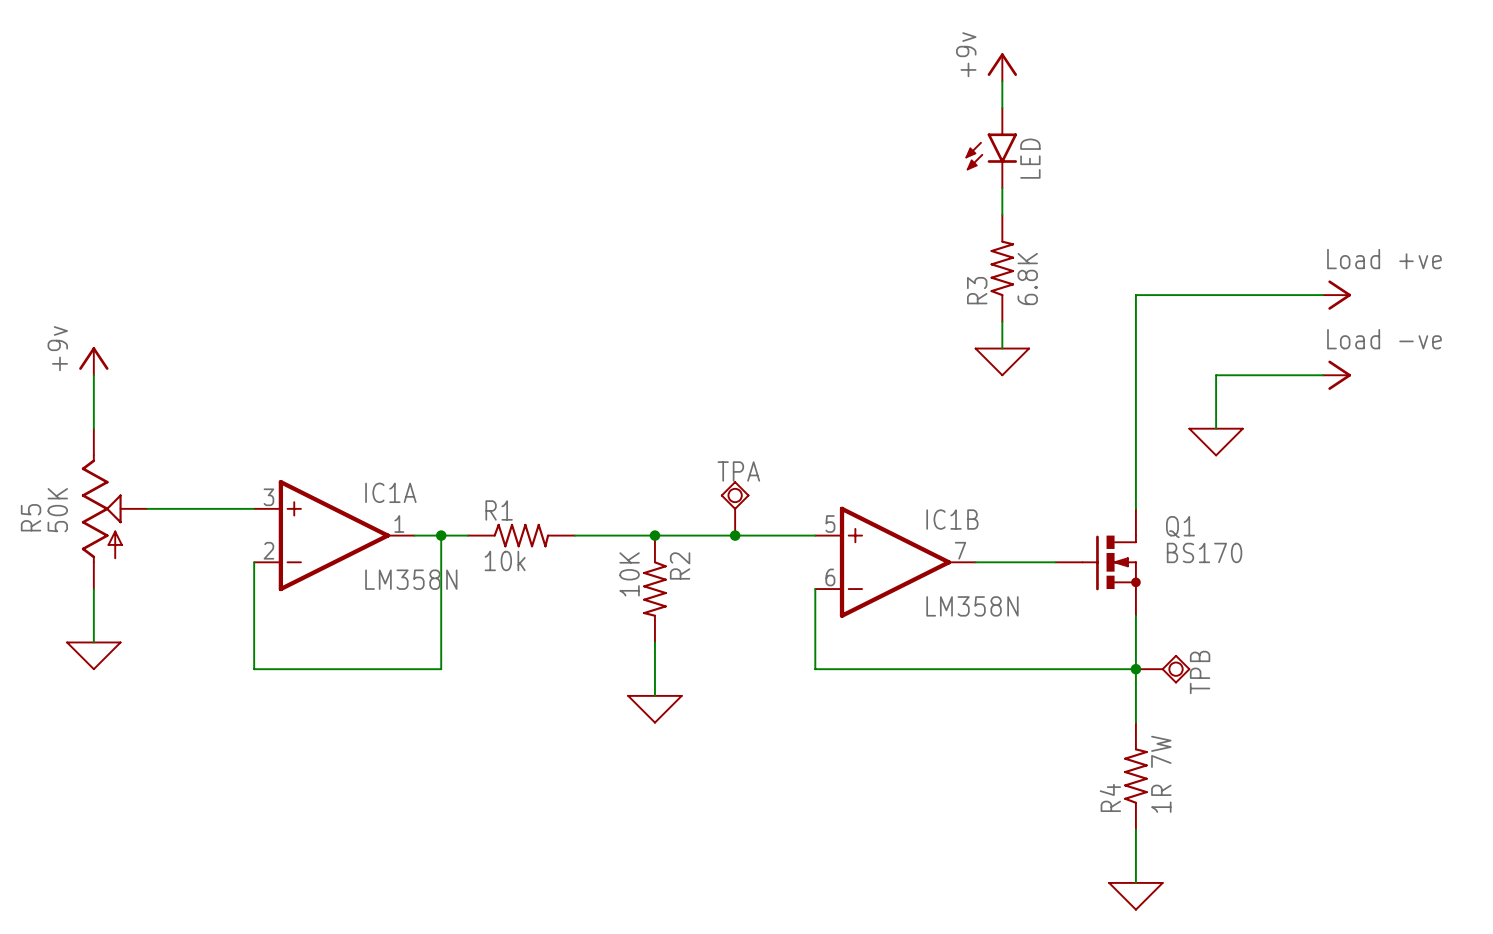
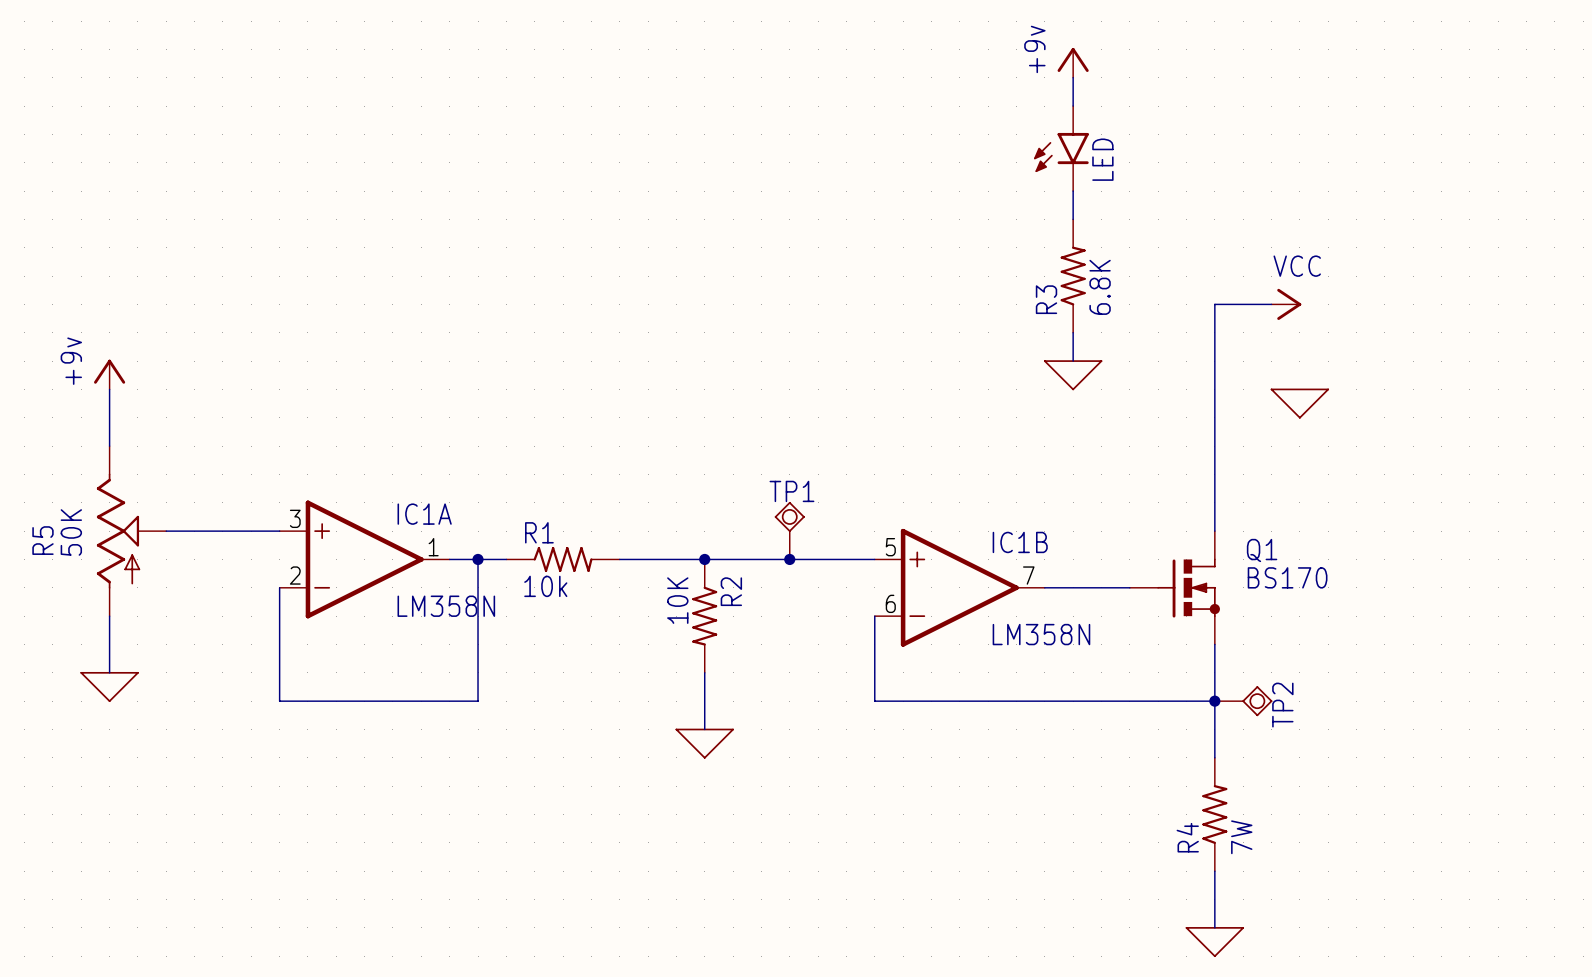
wire: (1189, 295) (1322, 295) -> none
power symbol: none -> VCC (1286, 304)
power symbol: Load +ve (1337, 295) -> none
wire: (1322, 375) (1216, 375) (1216, 428) -> none
power symbol: Load -ve (1337, 375) -> none
power symbol position: (1216, 442) -> (1299, 403)
TPA name: TPA (738, 471) -> TP1 (791, 491)
TPB name: TPB (1200, 672) -> TP2 (1282, 705)
R4 value: 1R 7W (1161, 774) -> 7W (1241, 837)

